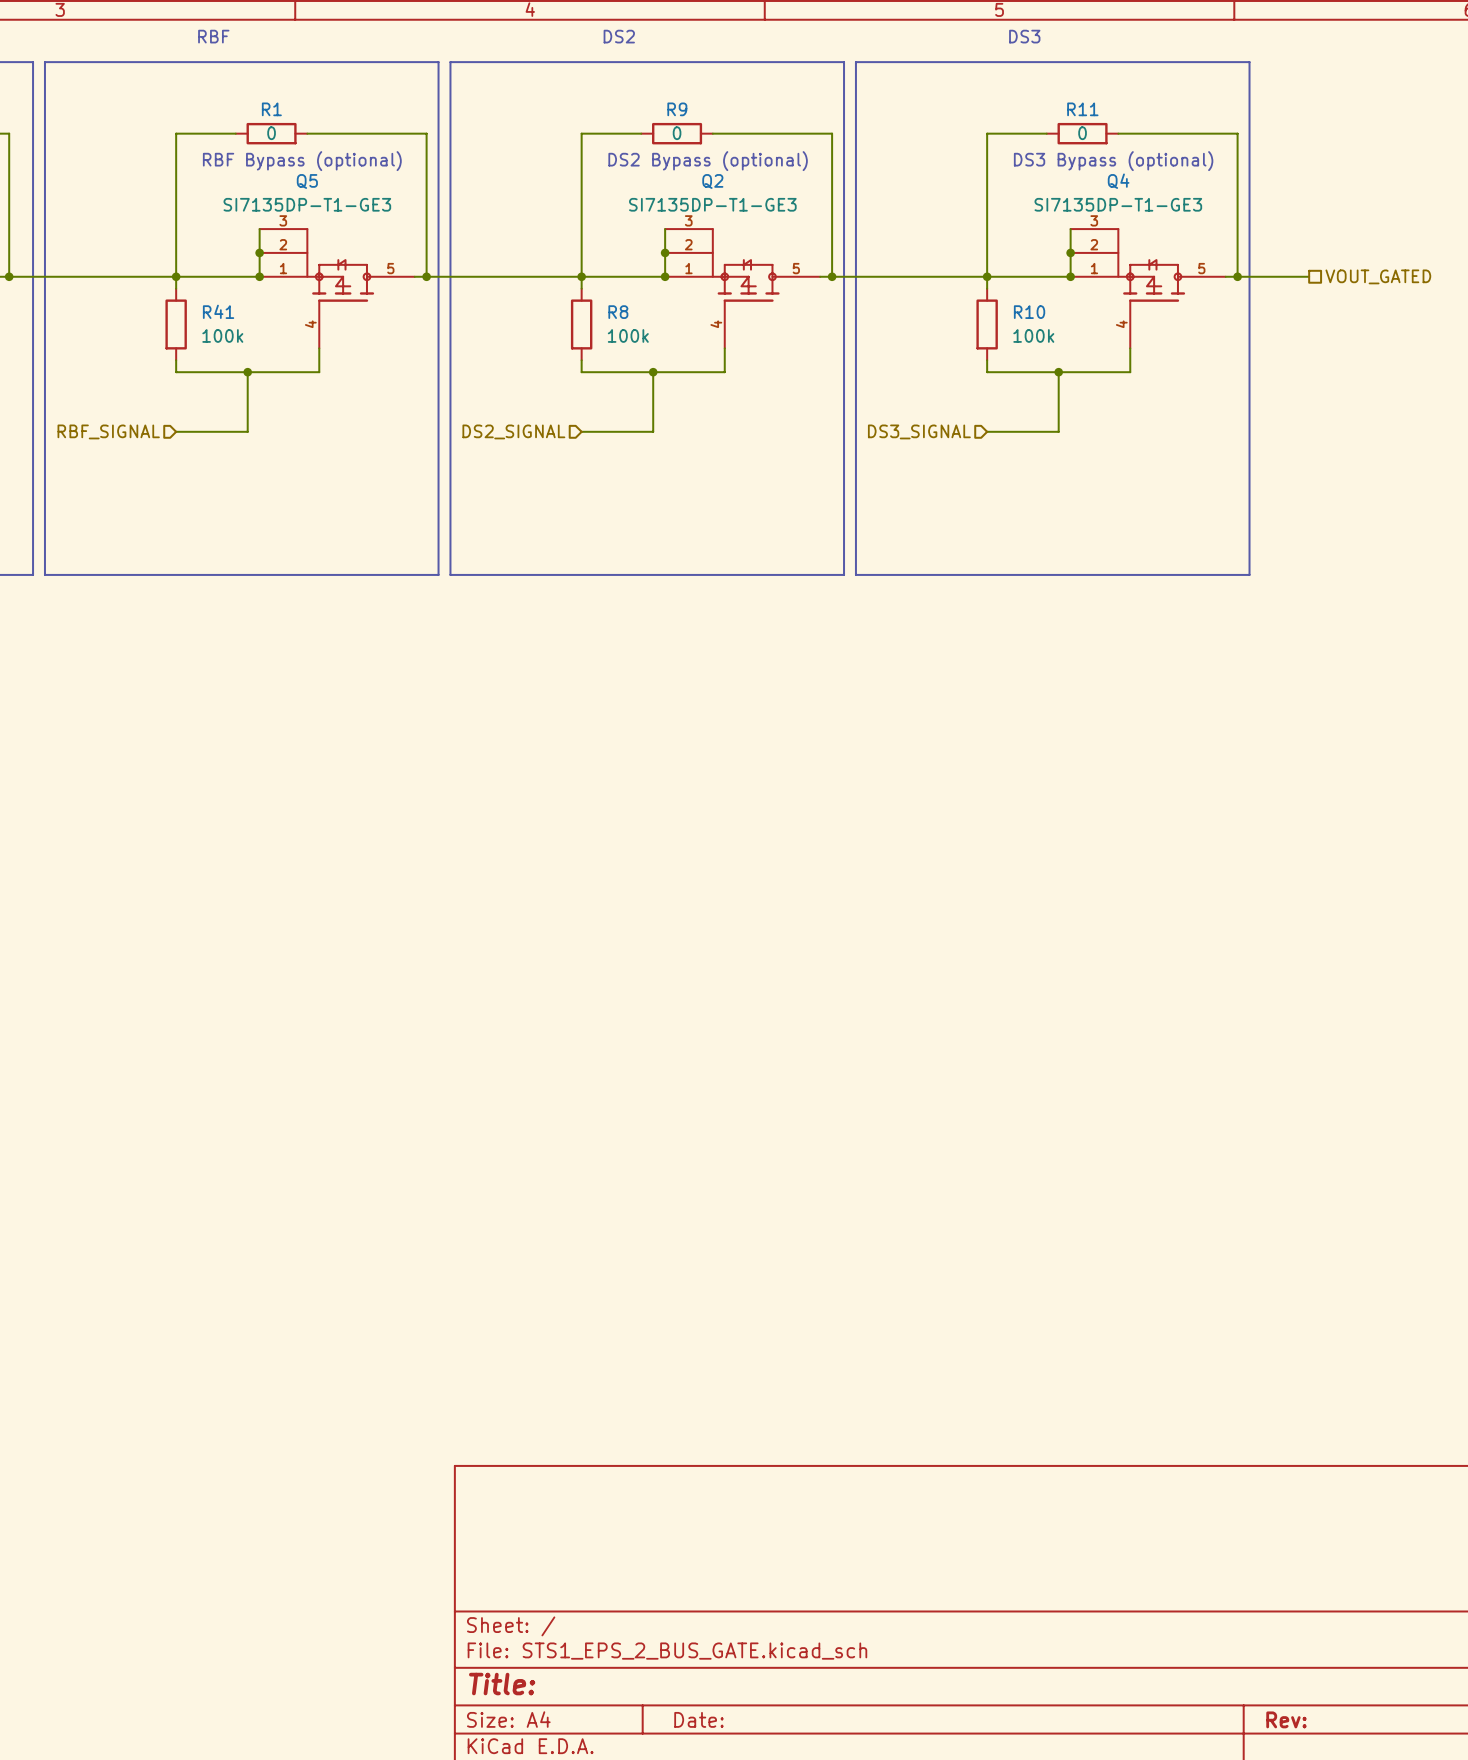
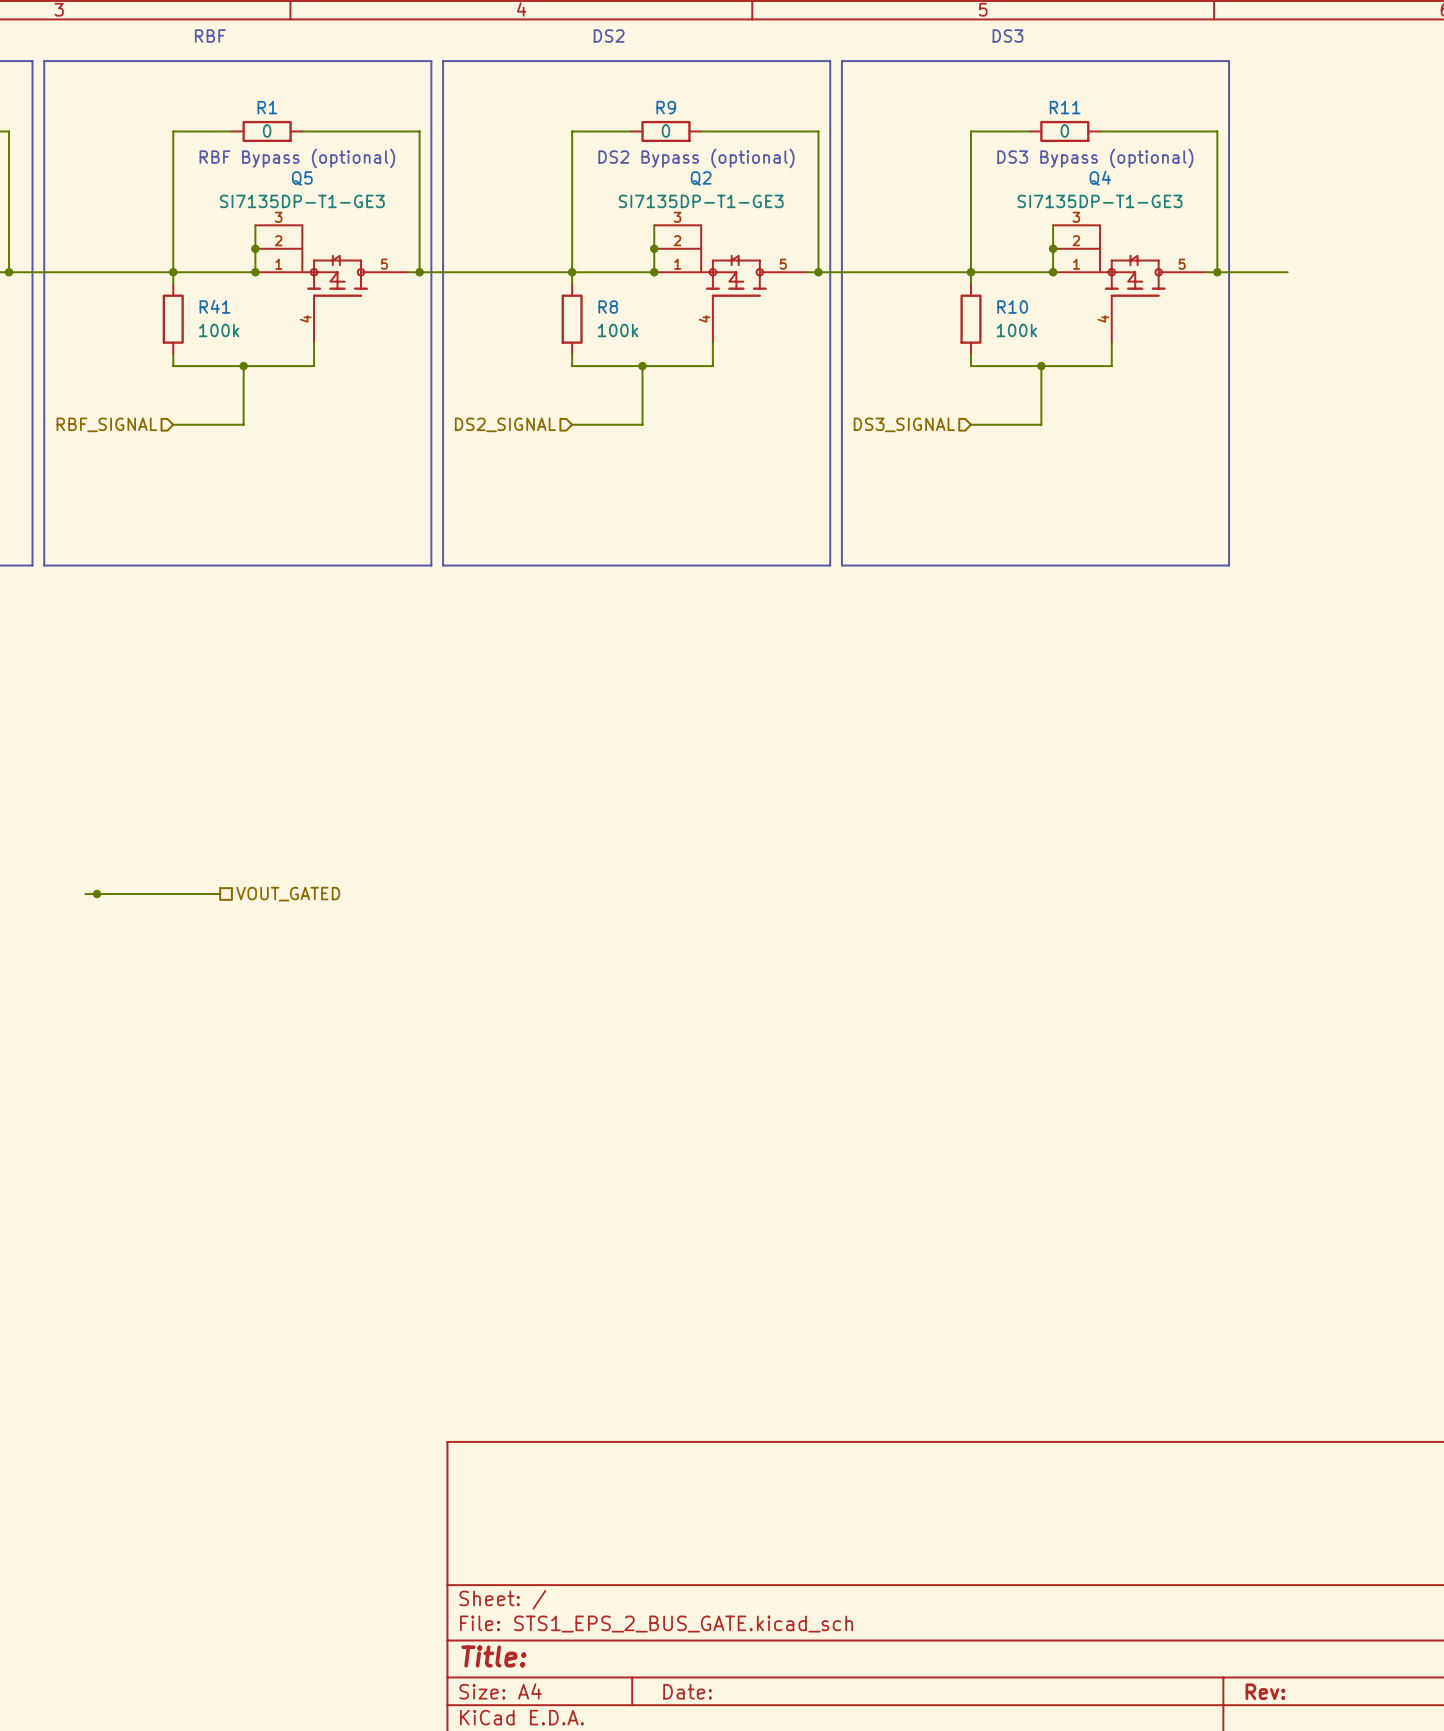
hierarchical label: VOUT_GATED (1378, 276) -> none
wire: none -> (85, 893) (220, 893)
junction: none -> (97, 893)
hierarchical label: none -> VOUT_GATED (288, 894)

